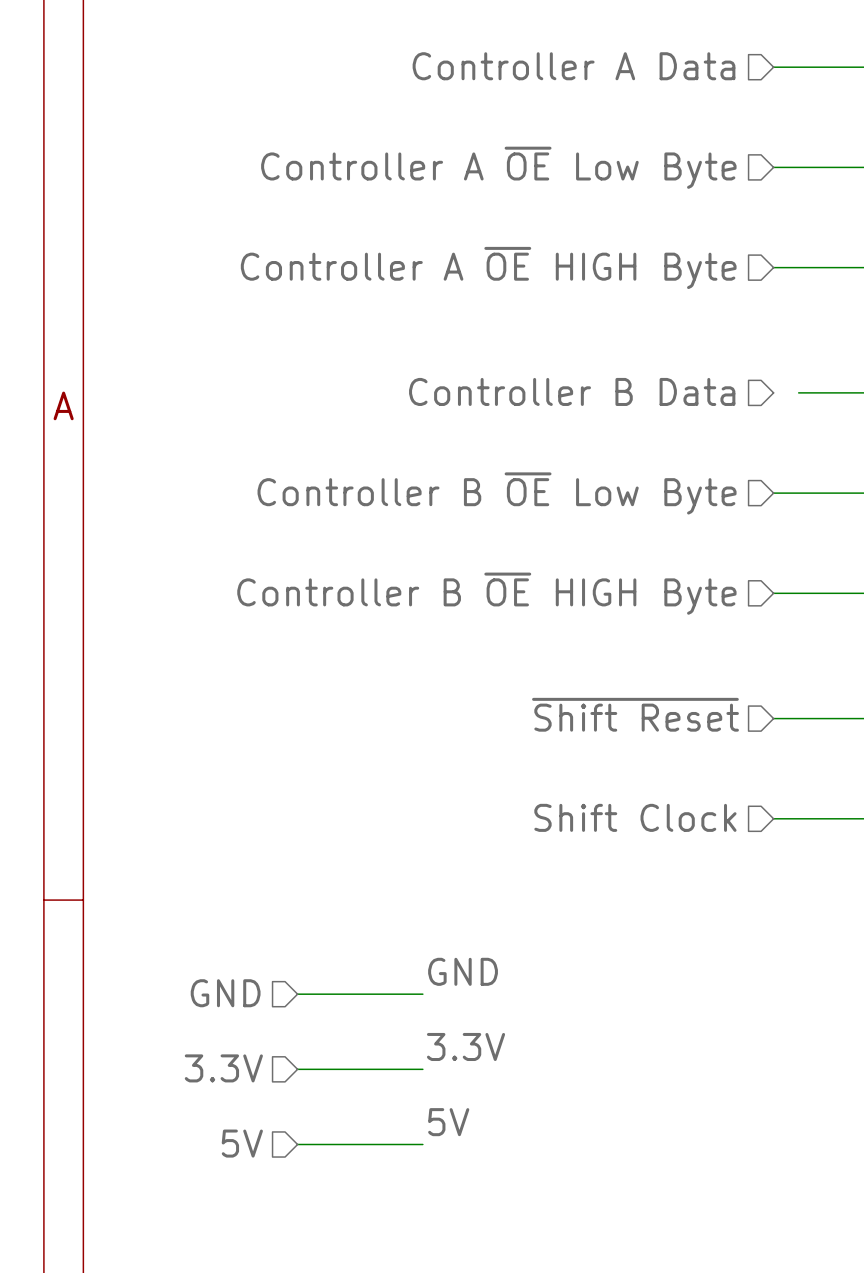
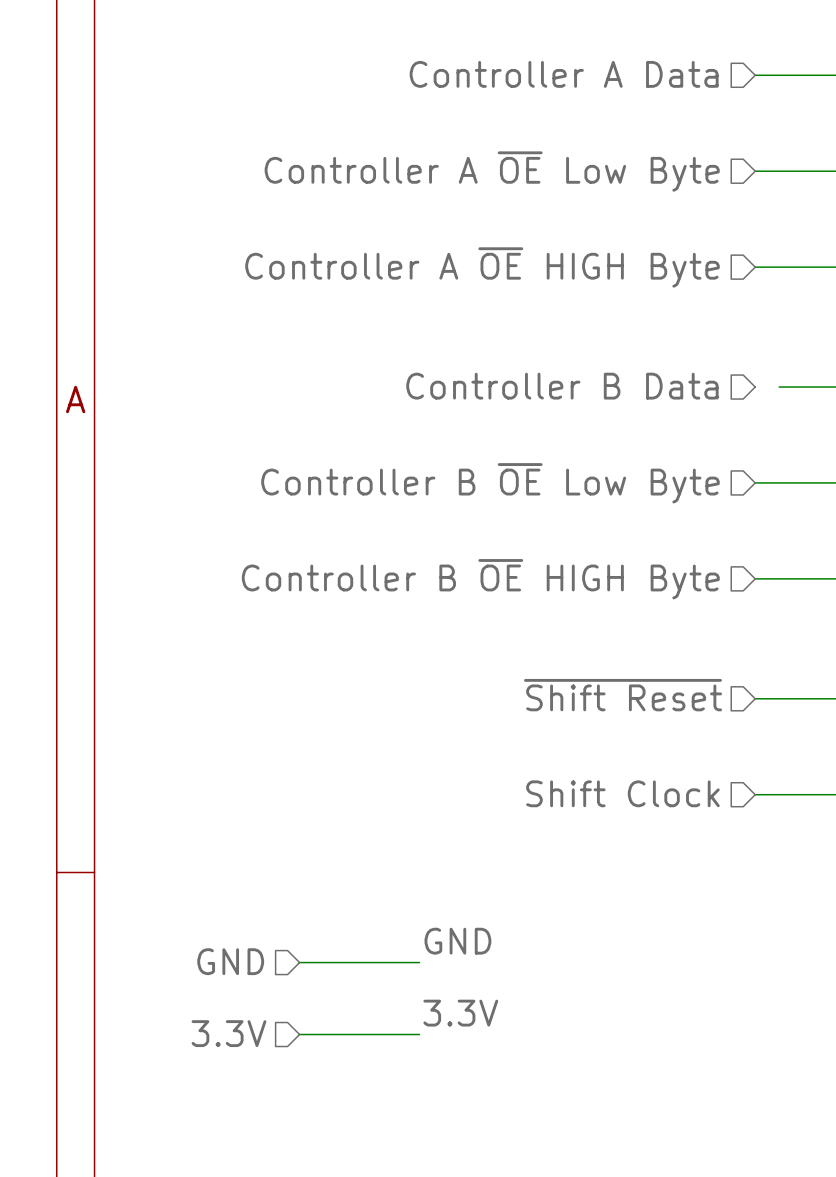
label: 5V (448, 1122) -> none
hierarchical label: 5V (242, 1143) -> none
wire: (297, 1144) (422, 1144) -> none

